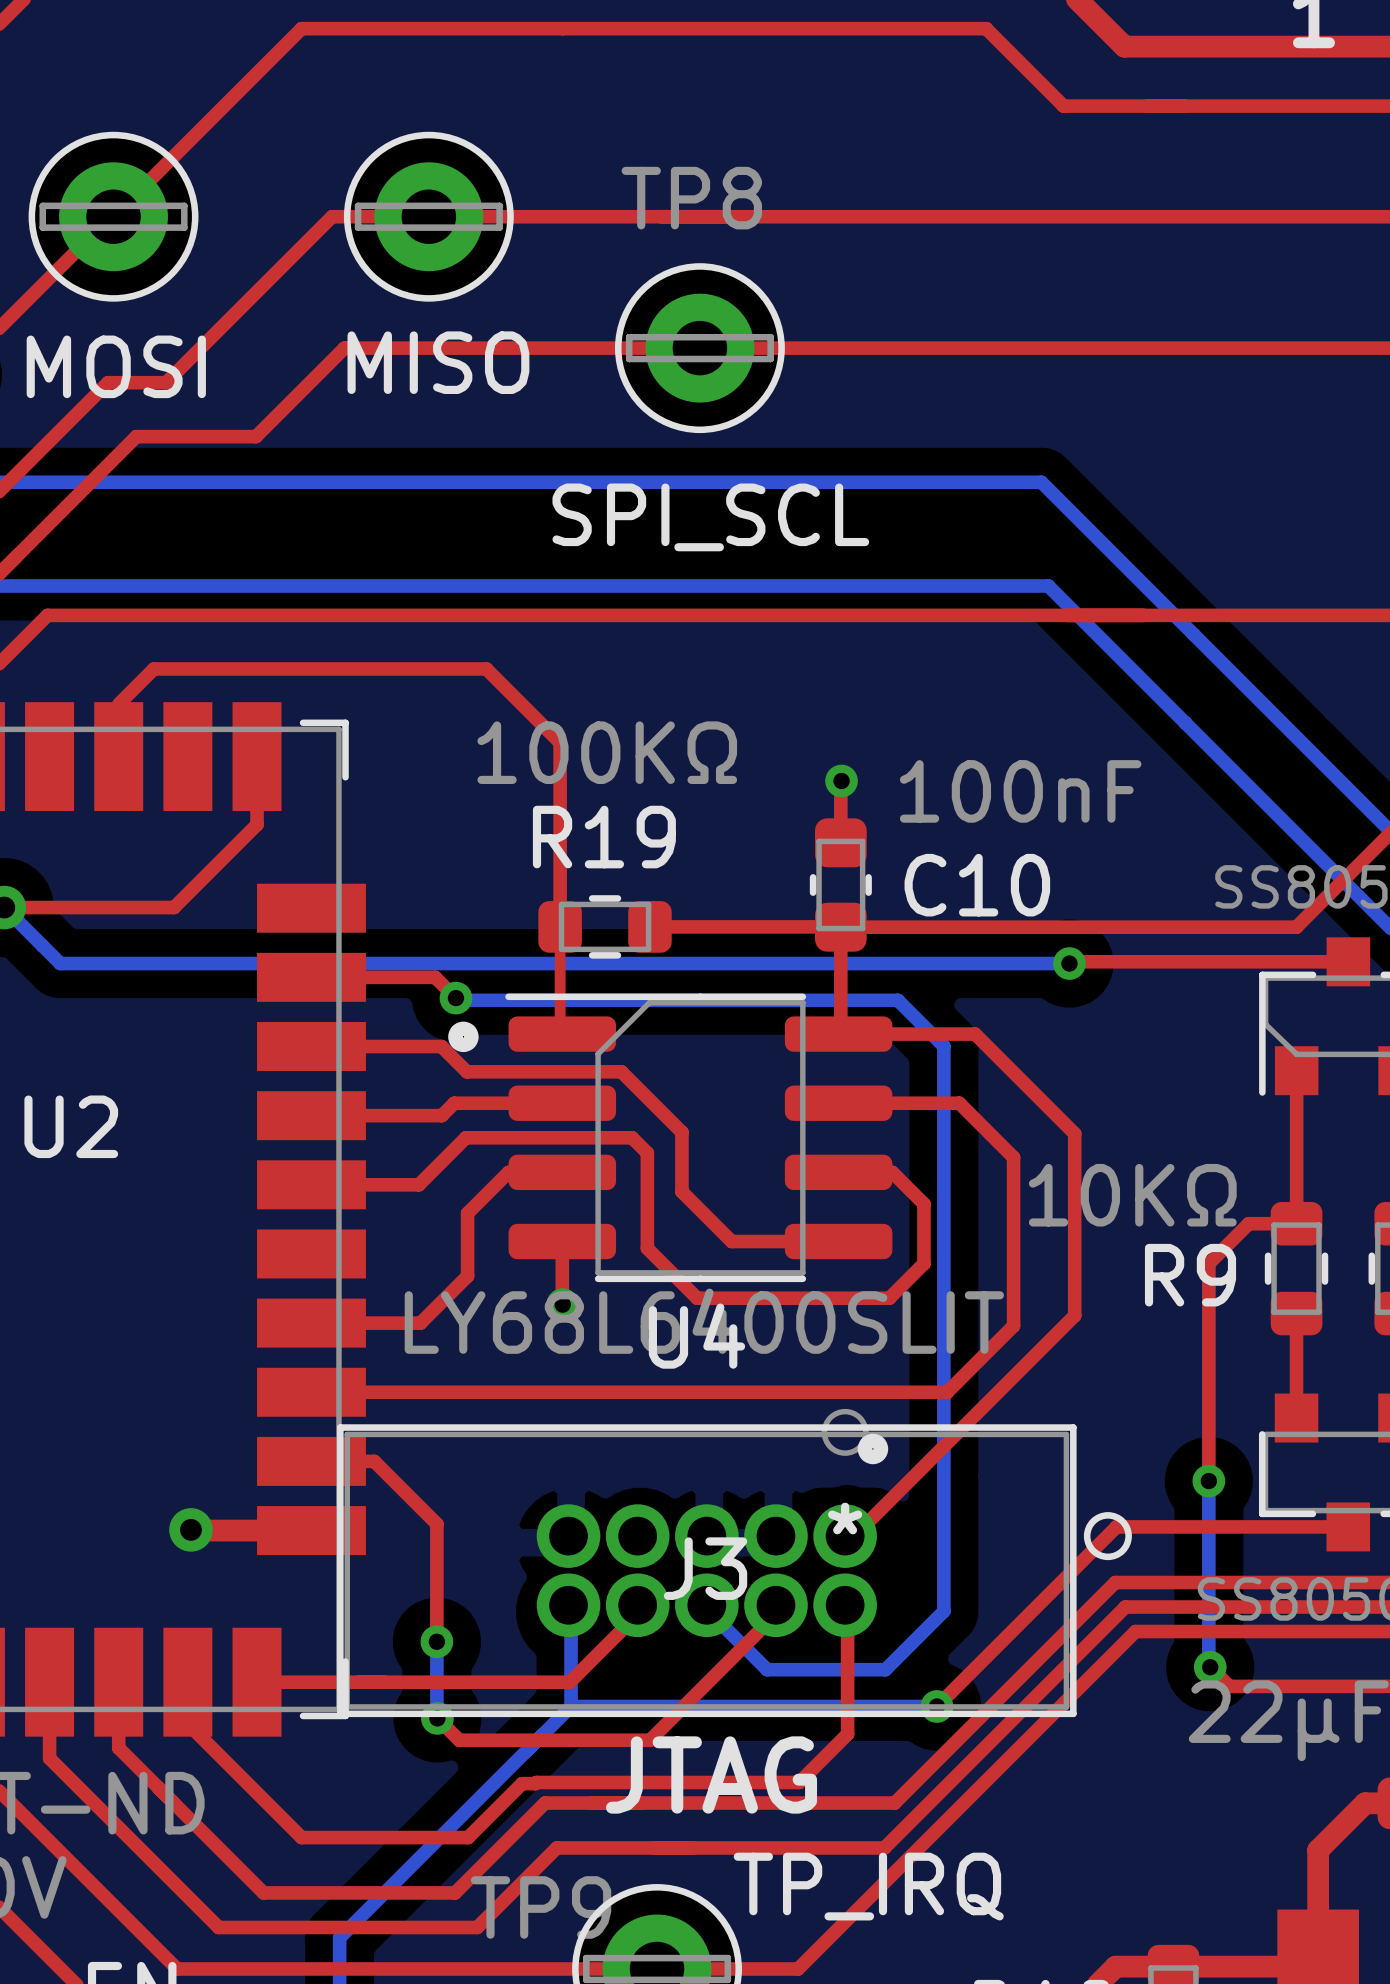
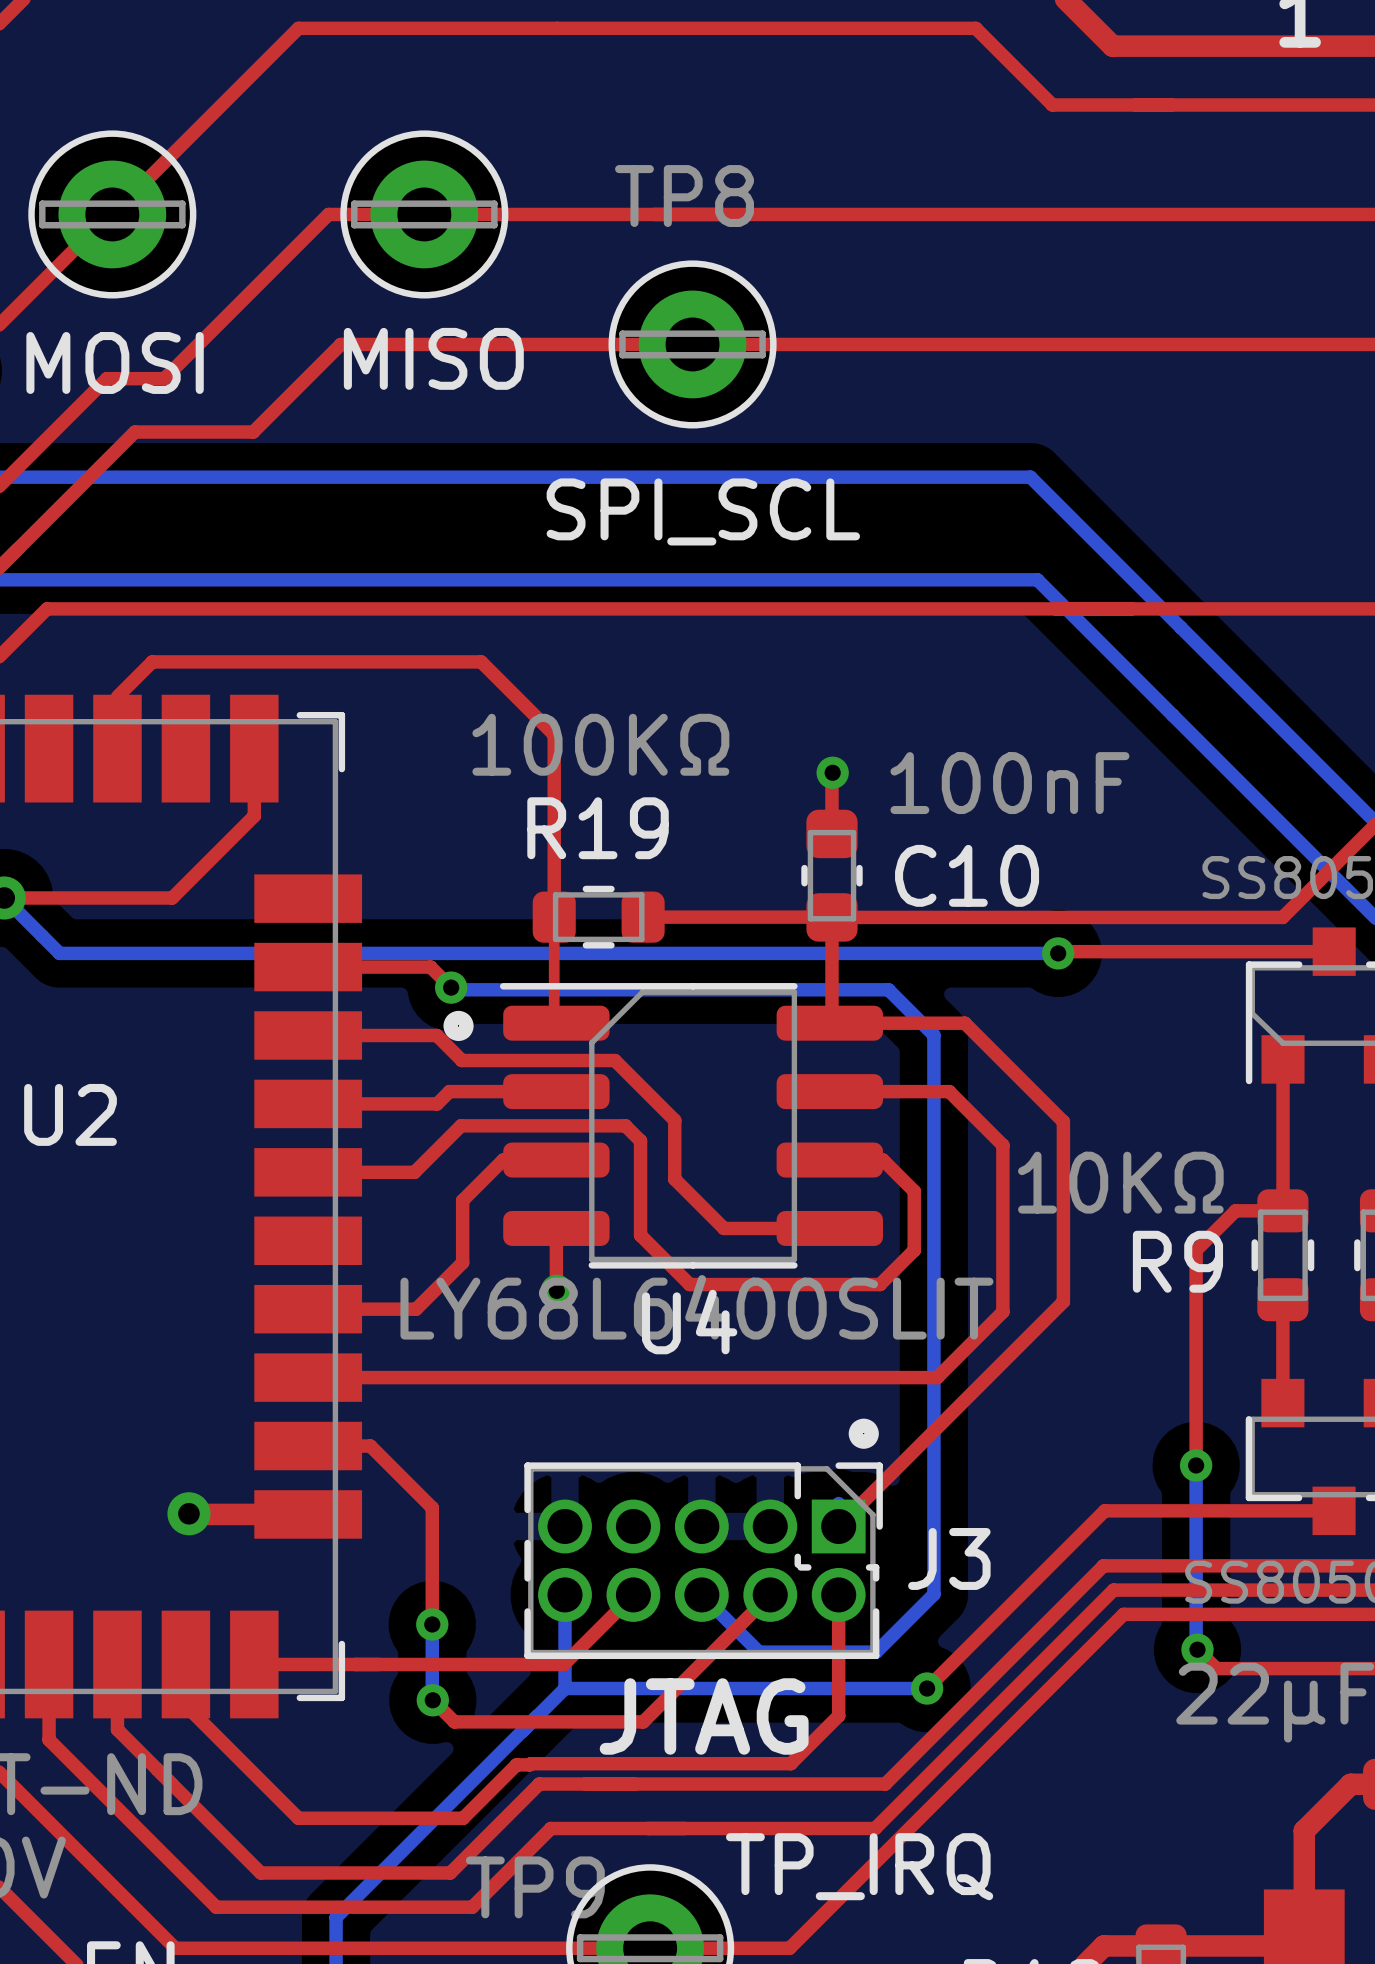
J3 footprint: [337, 1408, 1132, 1718] -> [524, 1462, 883, 1660]
J3 name position: J3 (705, 1568) -> J3 (949, 1558)
text position: JTAG (711, 1774) -> JTAG (704, 1716)

